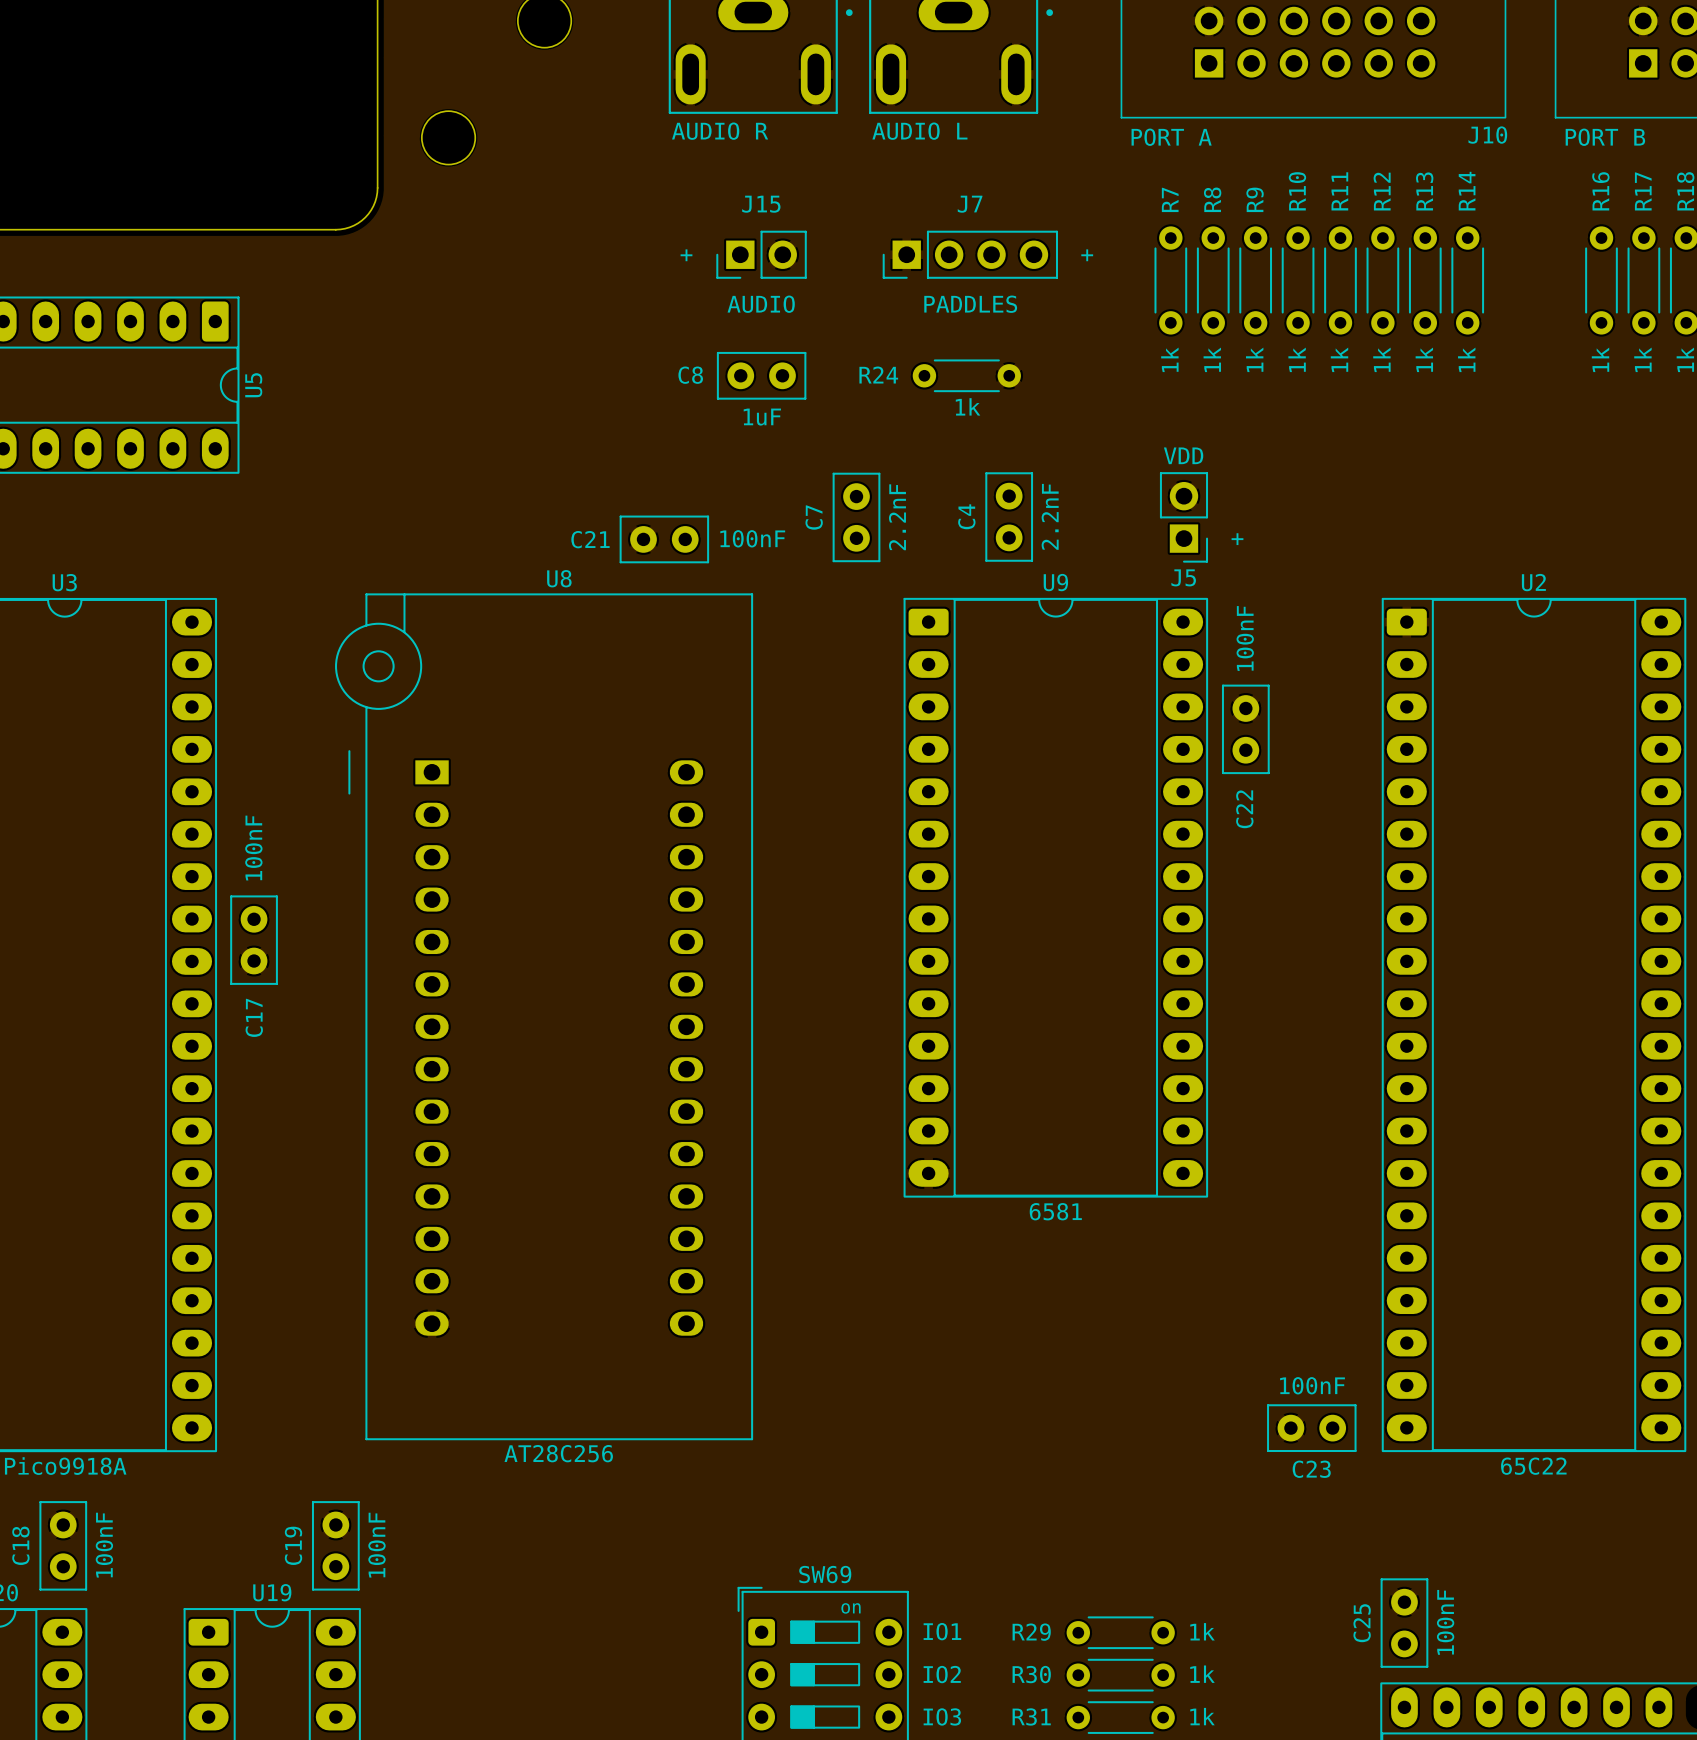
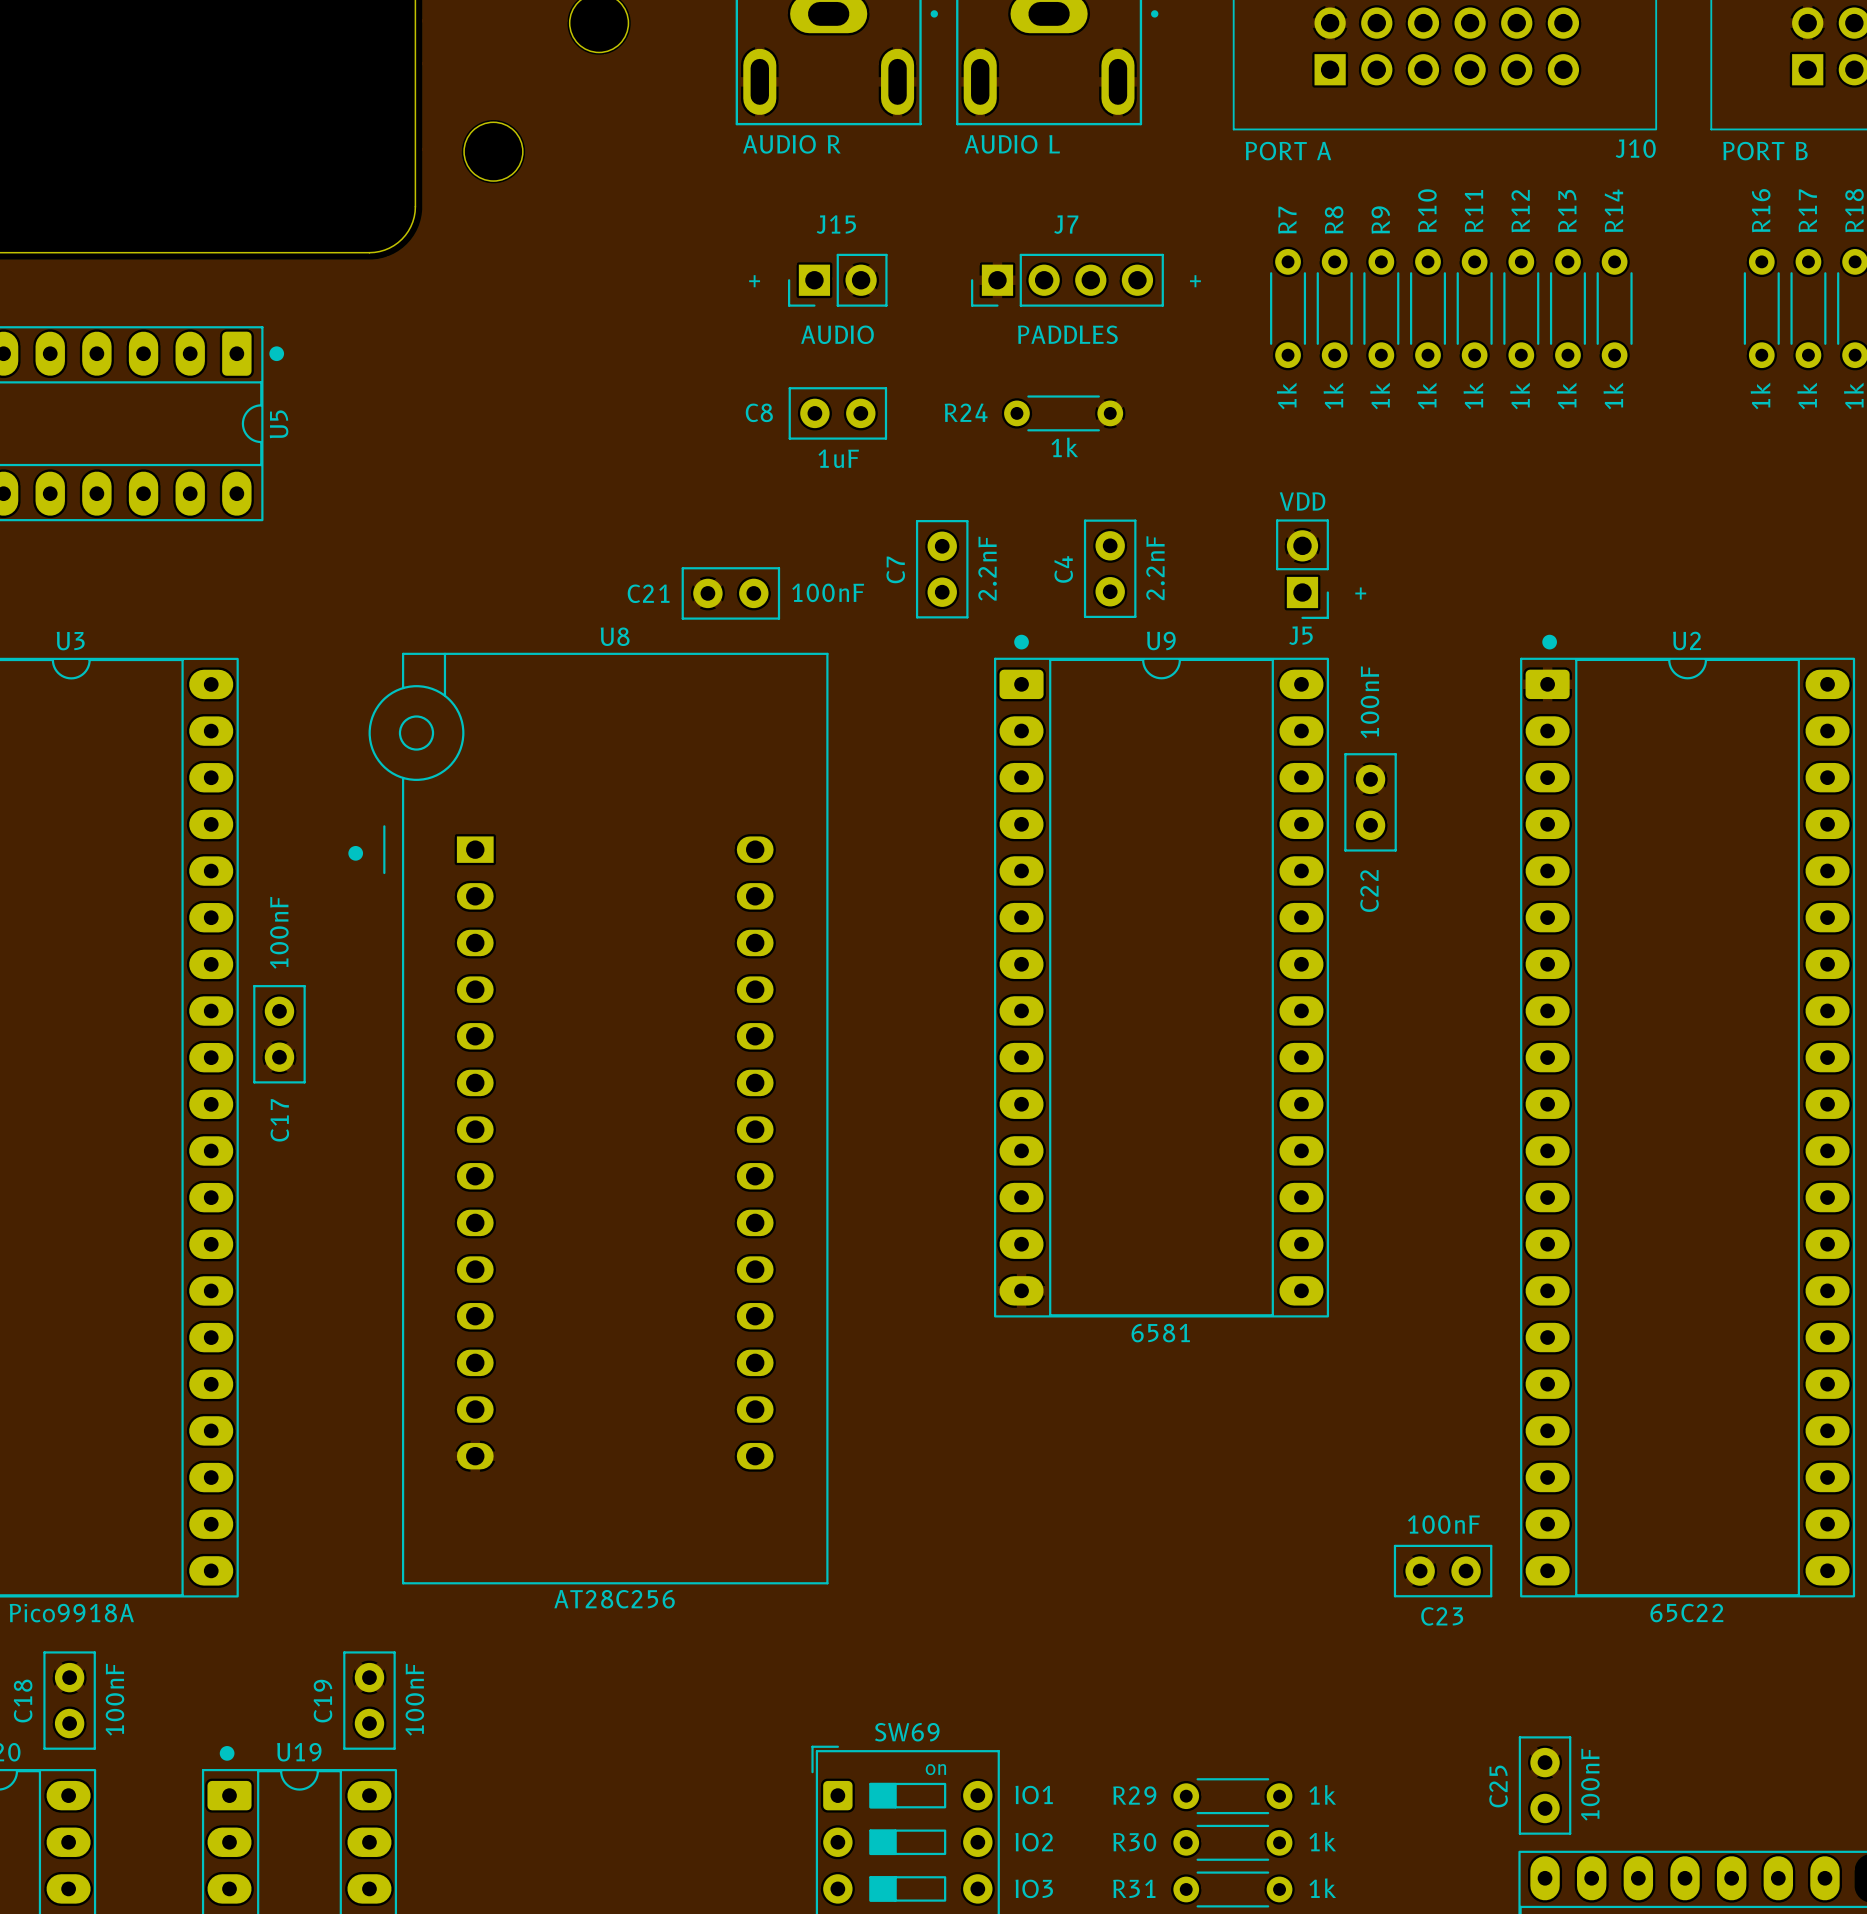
drawing: none -> [269, 346, 285, 362]
drawing: none -> [1014, 634, 1029, 650]
drawing: none -> [1542, 634, 1557, 650]
drawing: none -> [348, 845, 364, 861]
drawing: none -> [219, 1746, 235, 1761]

